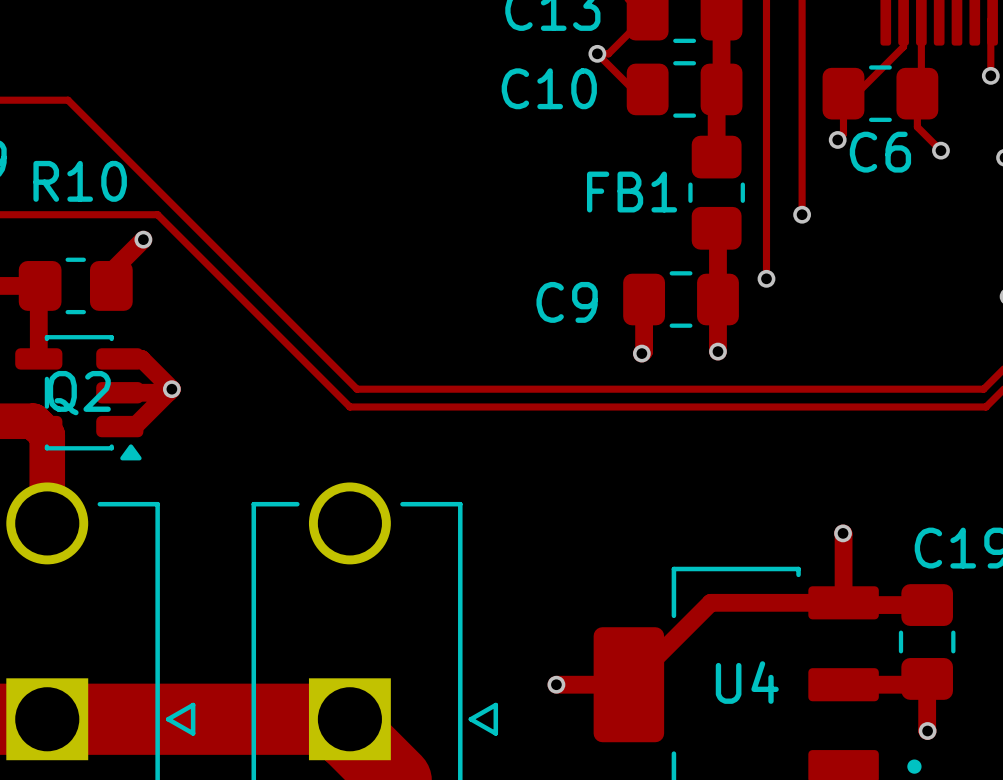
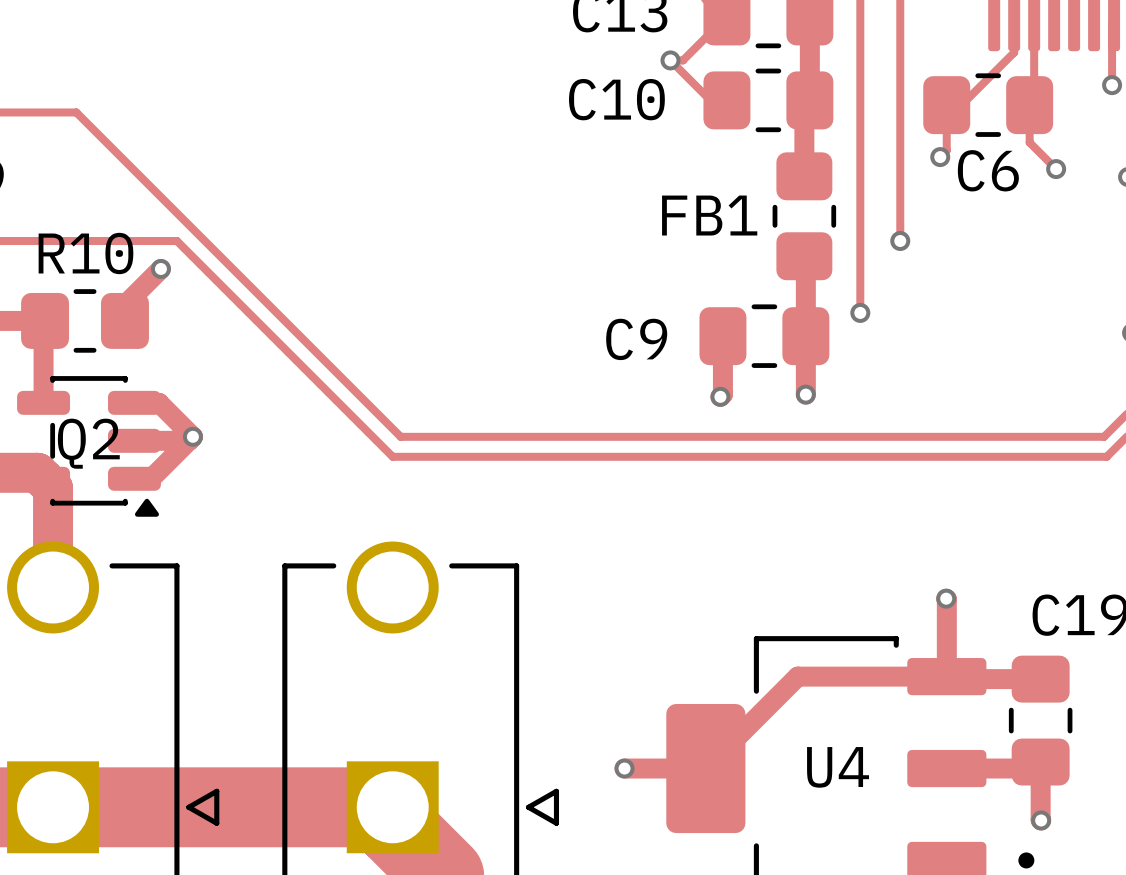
R10 name position: R10 (80, 181) -> R10 (85, 253)

